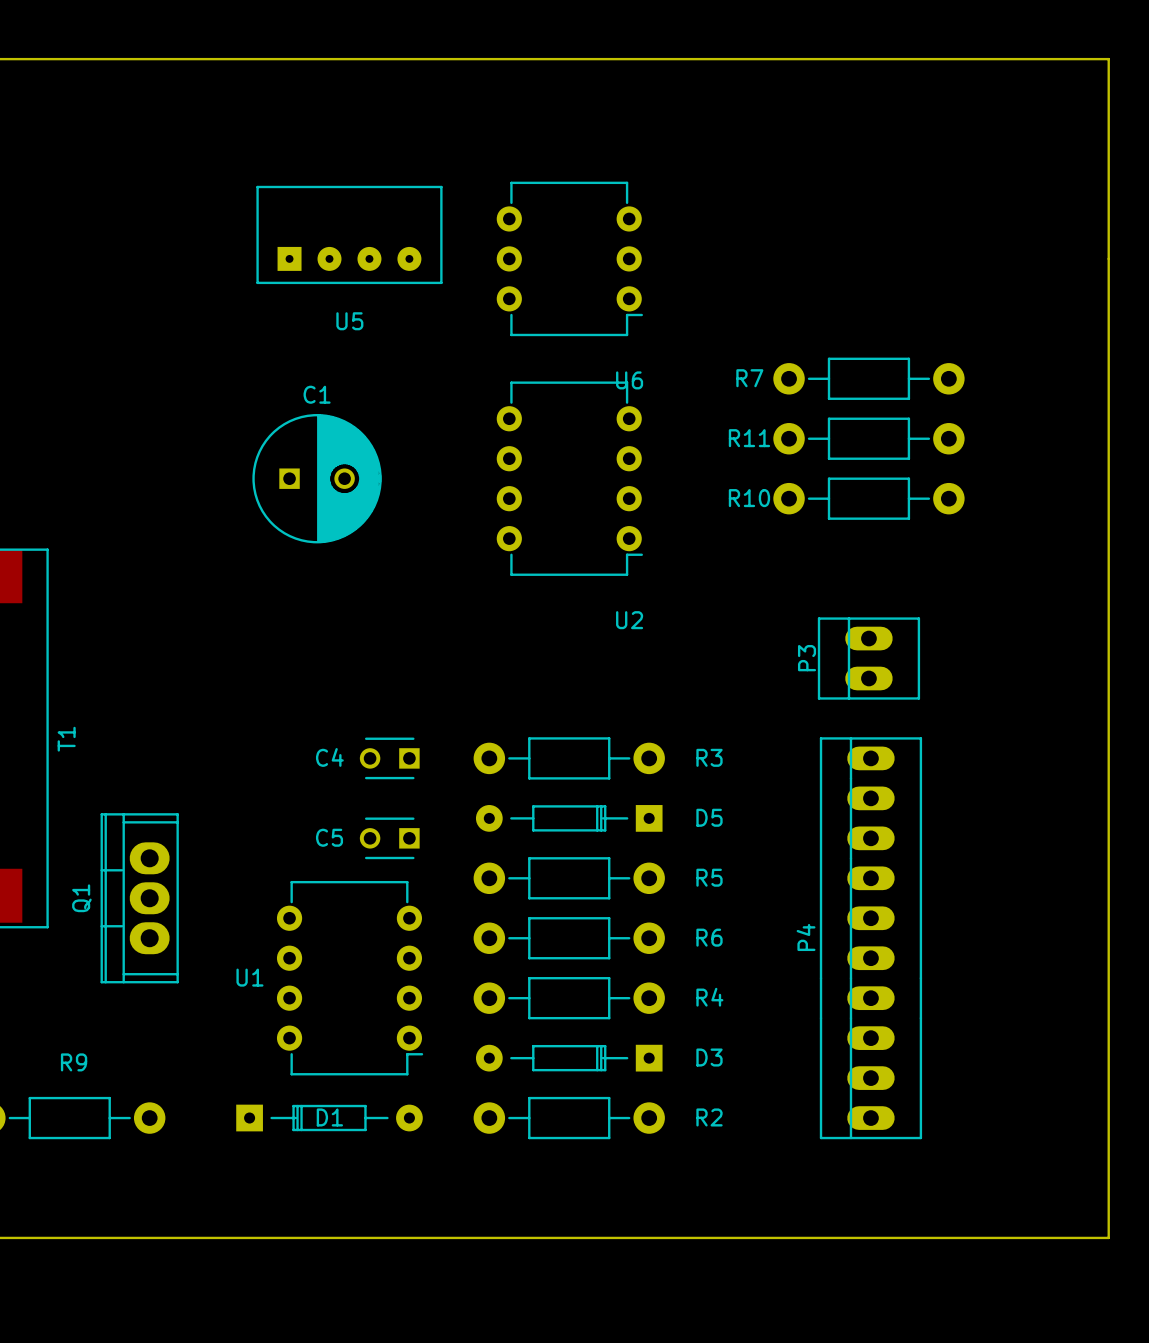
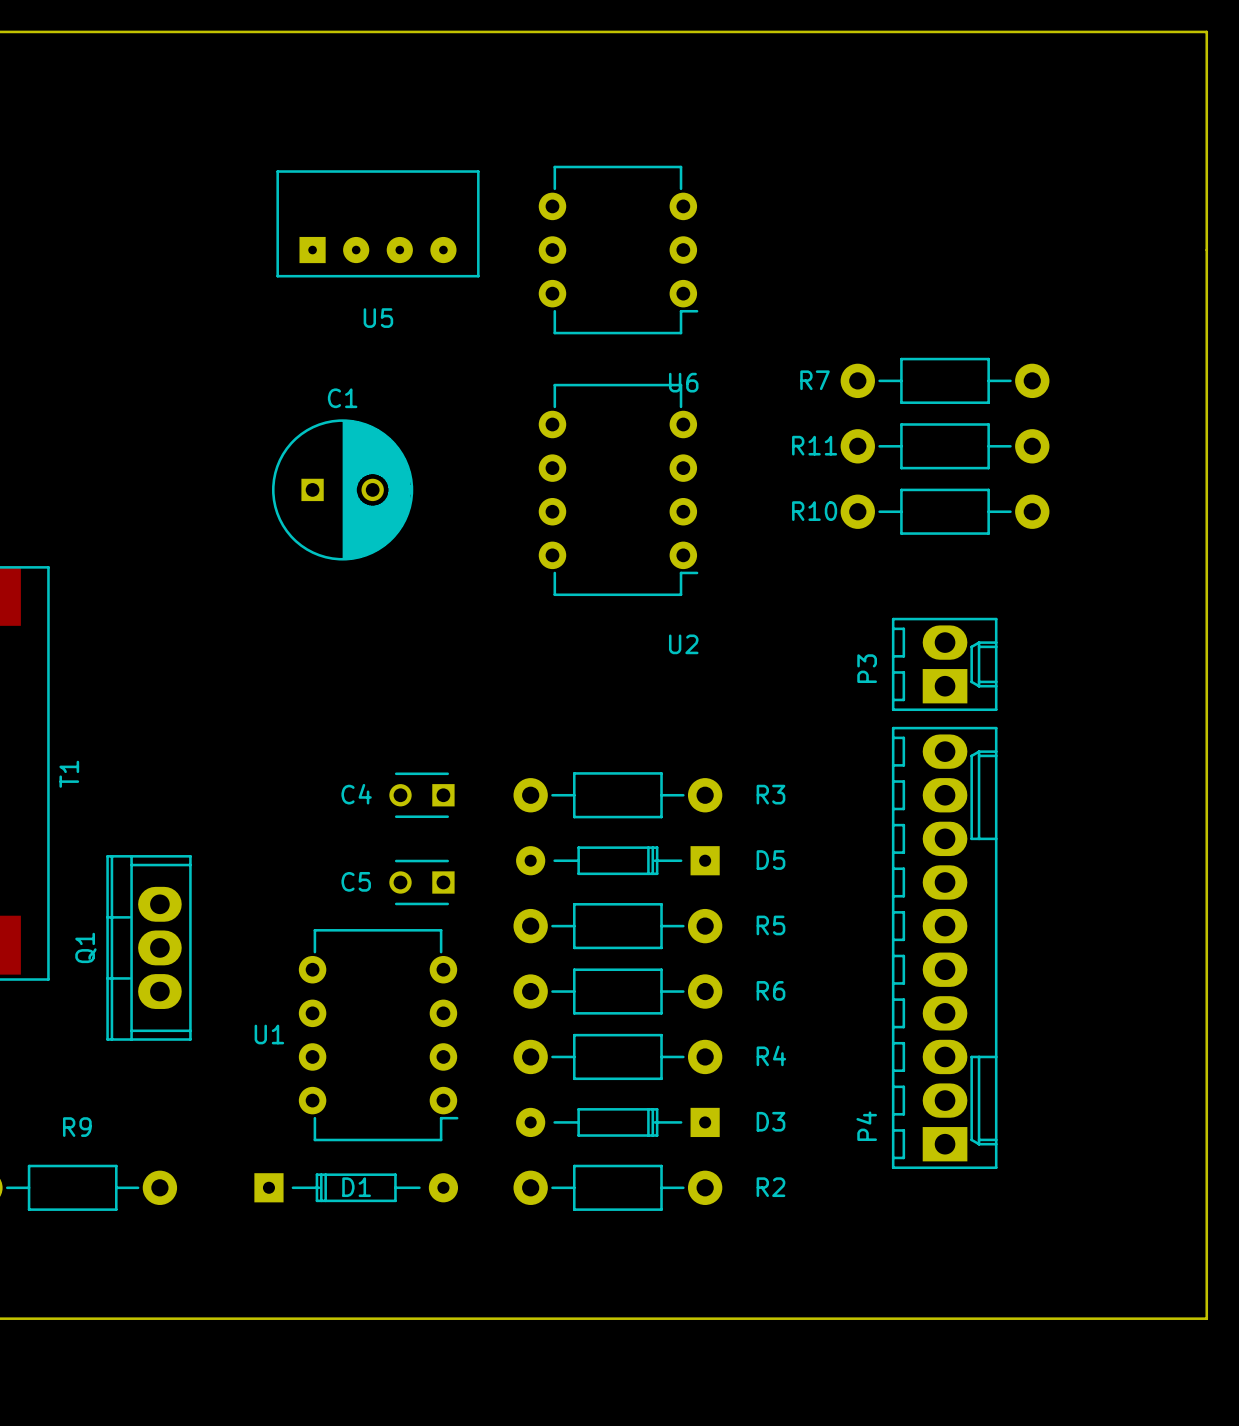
P3 footprint: [817, 617, 921, 700] -> [891, 617, 998, 712]
P4 footprint: [819, 737, 923, 1140] -> [891, 726, 998, 1170]
P4 name position: P4 (806, 937) -> P4 (866, 1126)

